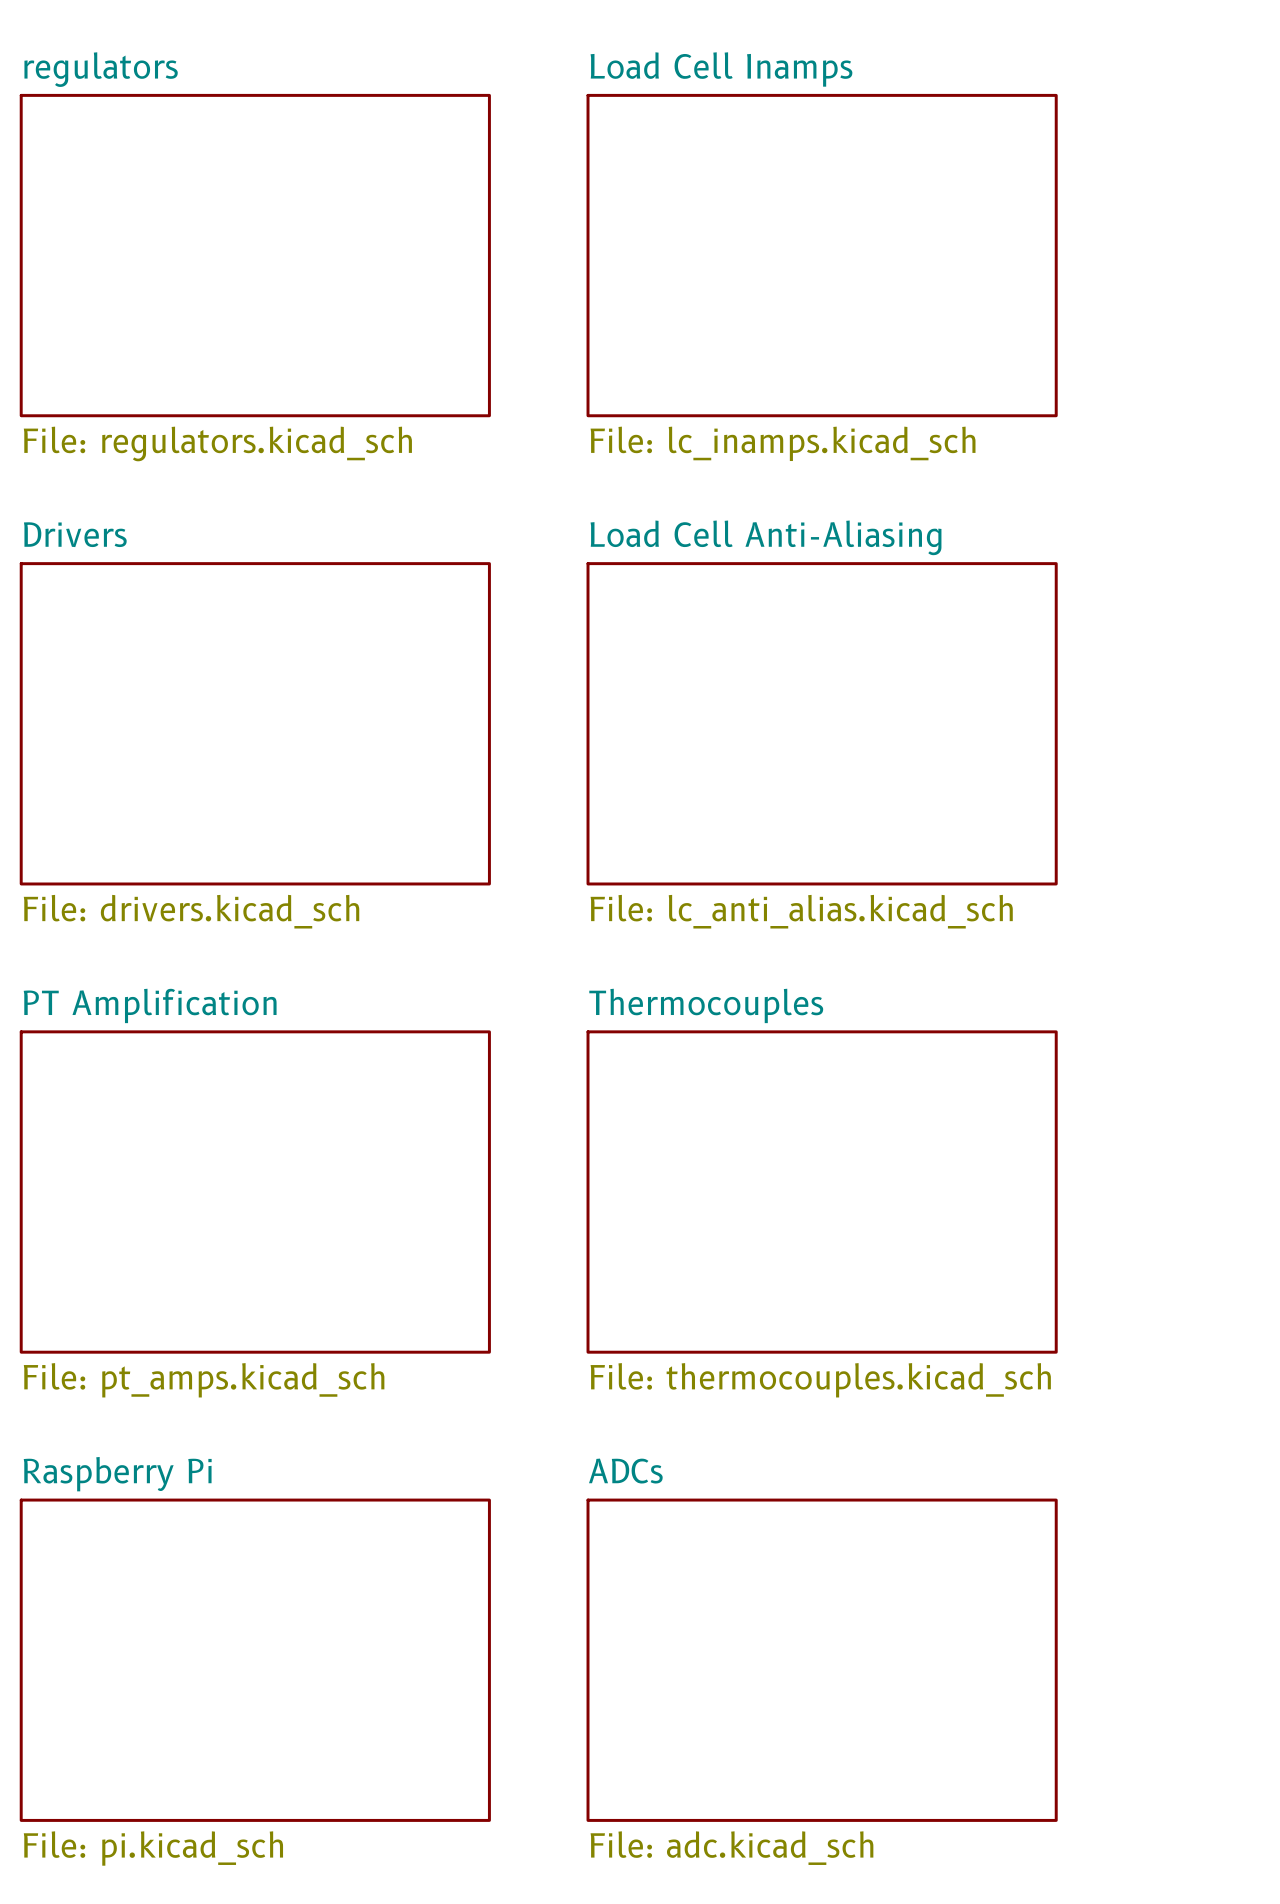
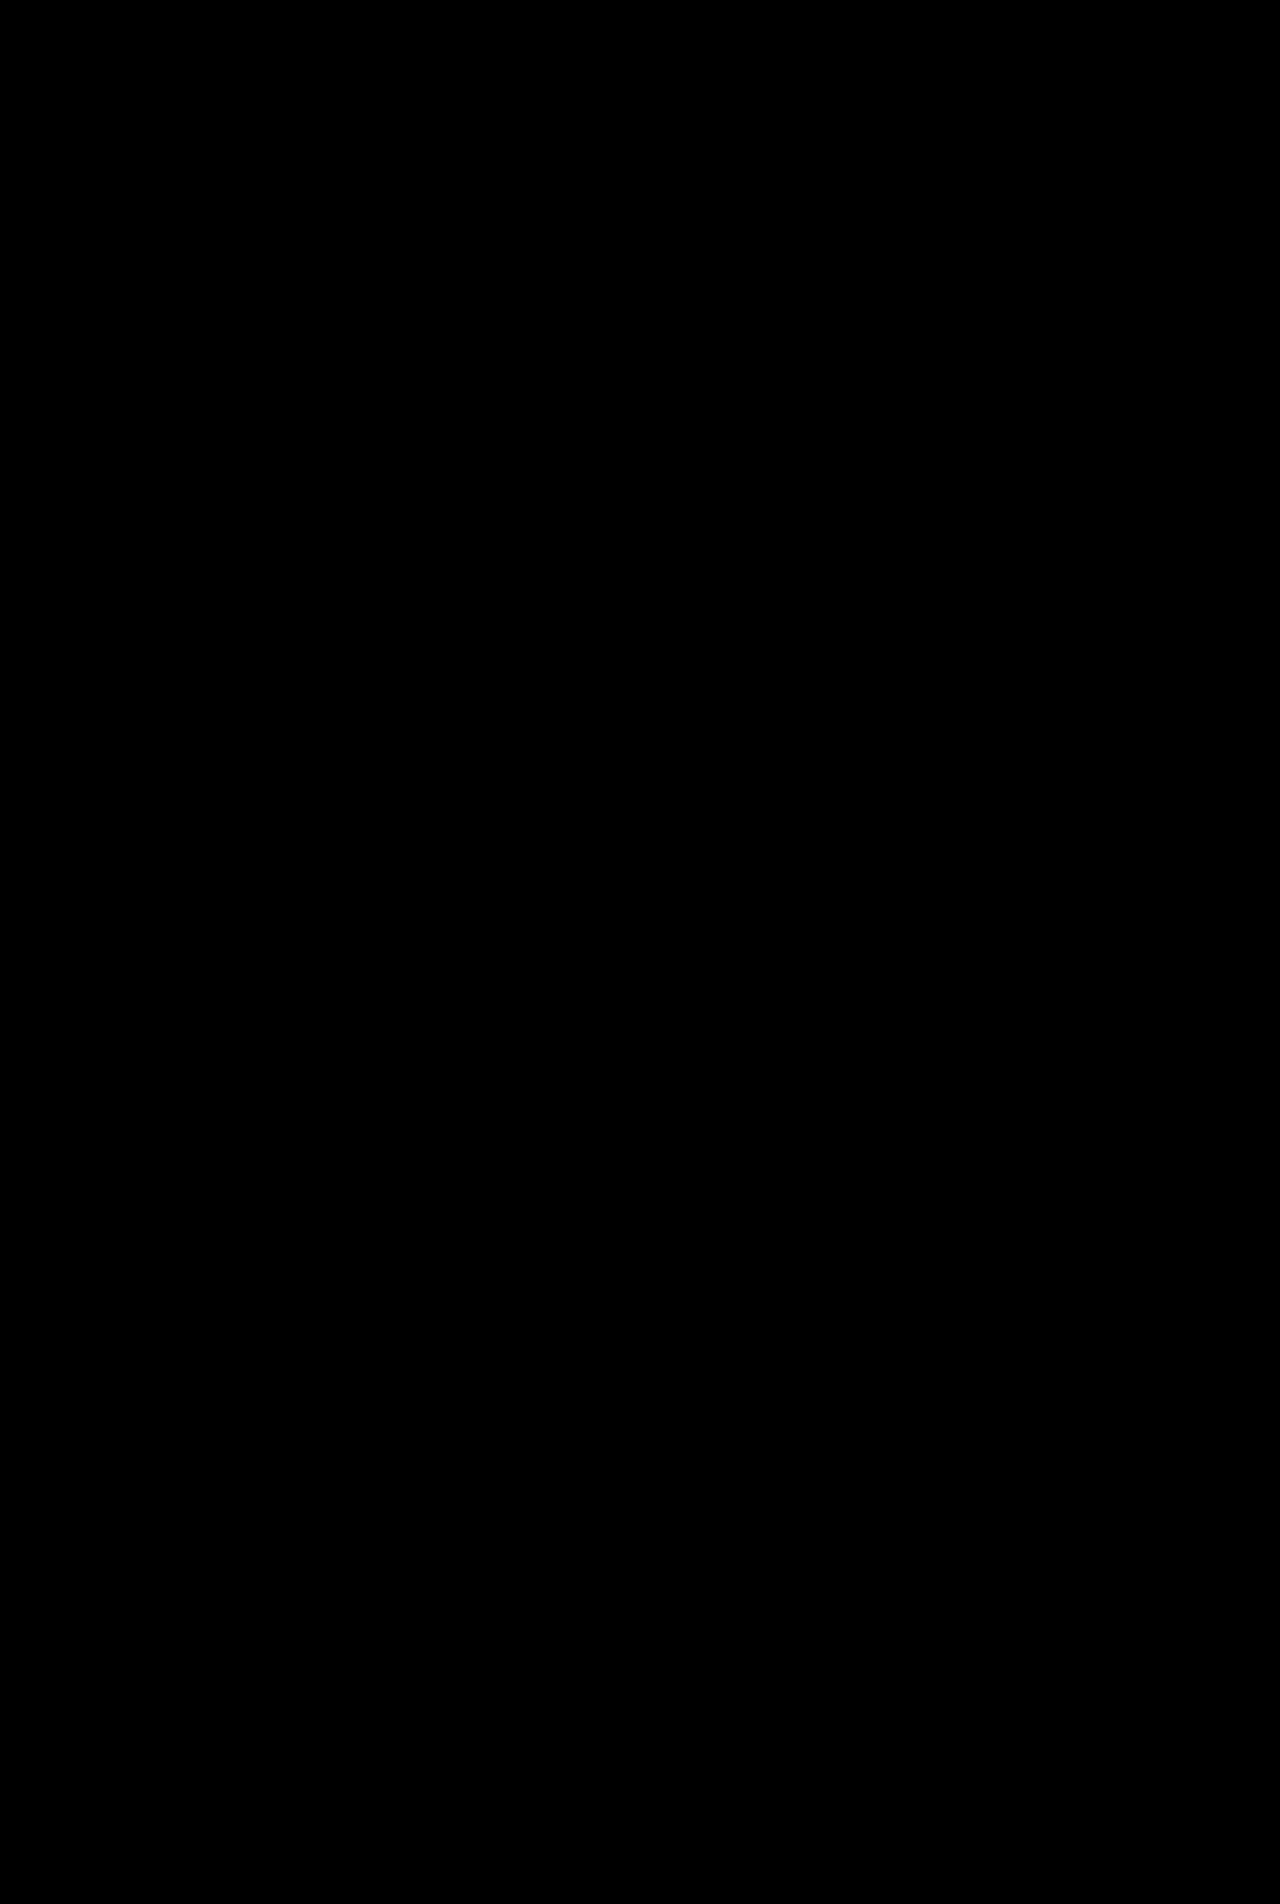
sheet regulators: File: regulators.kicad_sch (255, 255) -> none
sheet Load Cell Inamps: File: lc_inamps.kicad_sch (822, 255) -> none
sheet Drivers: File: drivers.kicad_sch (255, 723) -> none
sheet Load Cell Anti-Aliasing: File: lc_anti_alias.kicad_sch (822, 723) -> none
sheet PT Amplification: File: pt_amps.kicad_sch (255, 1192) -> none
sheet Thermocouples: File: thermocouples.kicad_sch (822, 1192) -> none
sheet Raspberry Pi: File: pi.kicad_sch (255, 1660) -> none
sheet ADCs: File: adc.kicad_sch (822, 1660) -> none

